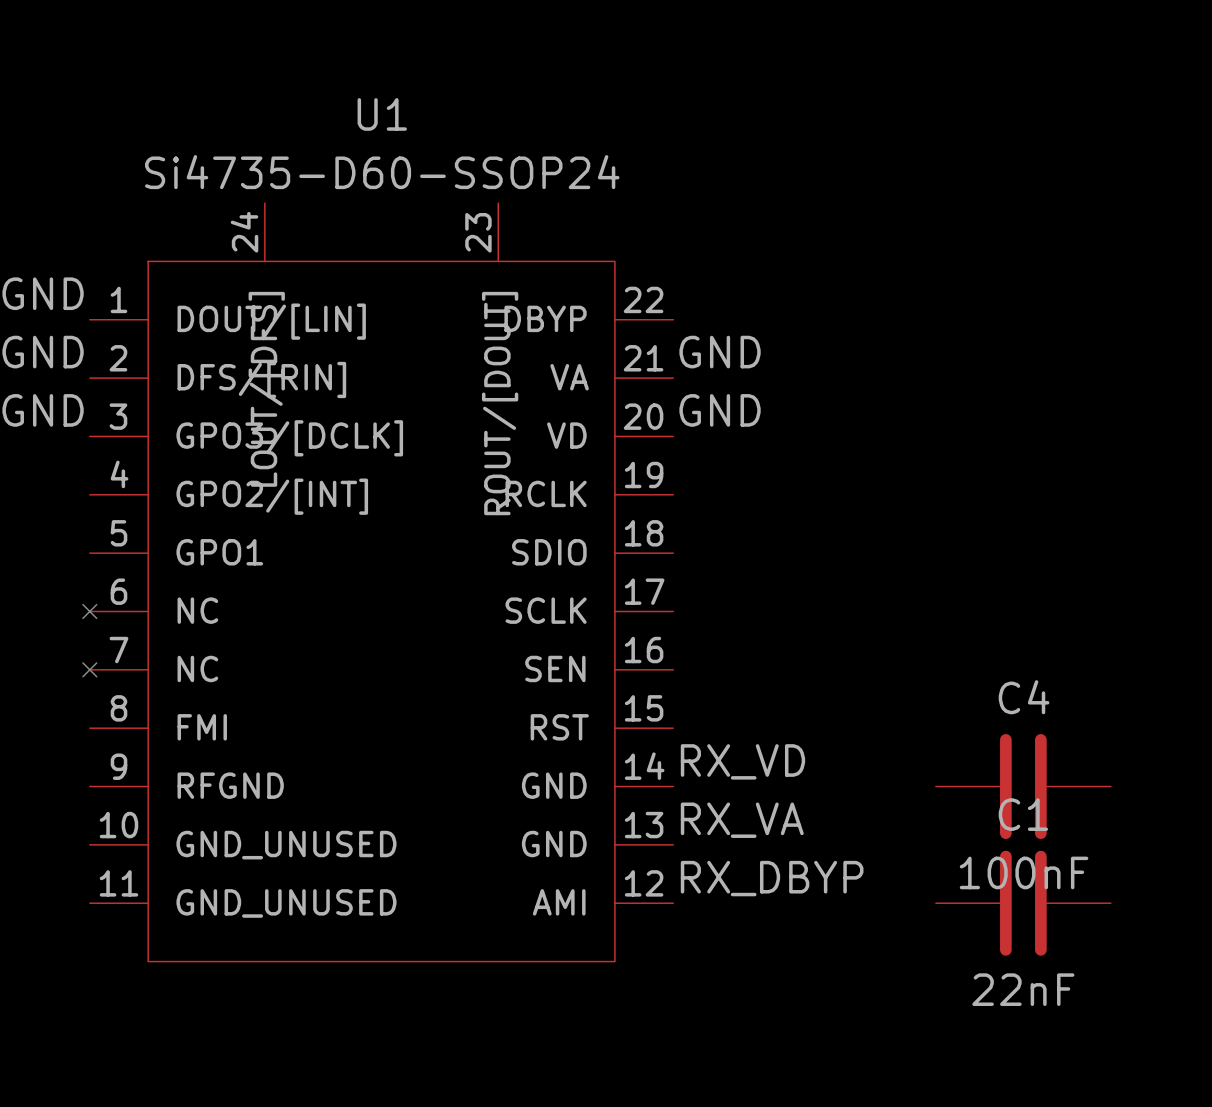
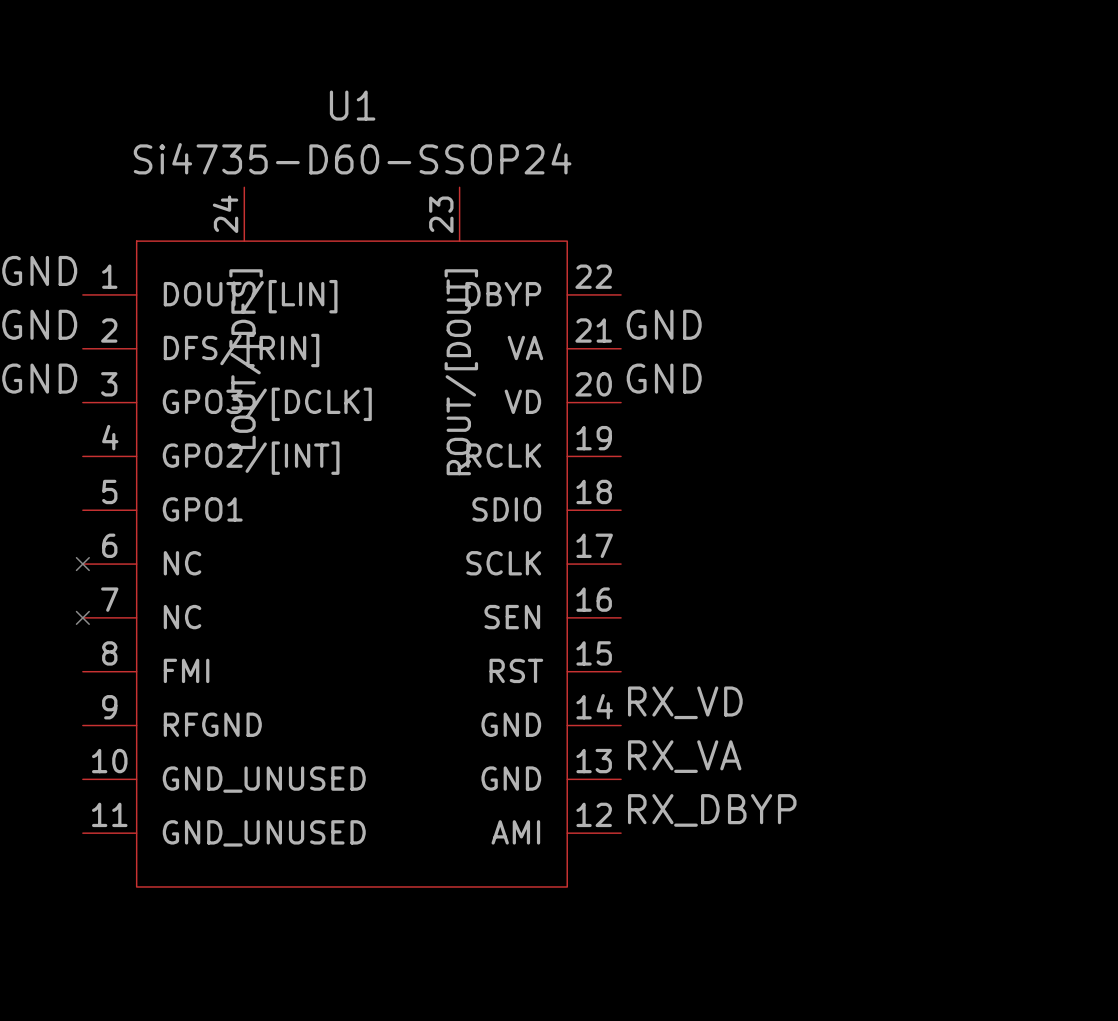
C4: 100nF (1023, 786) -> none
C1: 22nF (1023, 903) -> none

